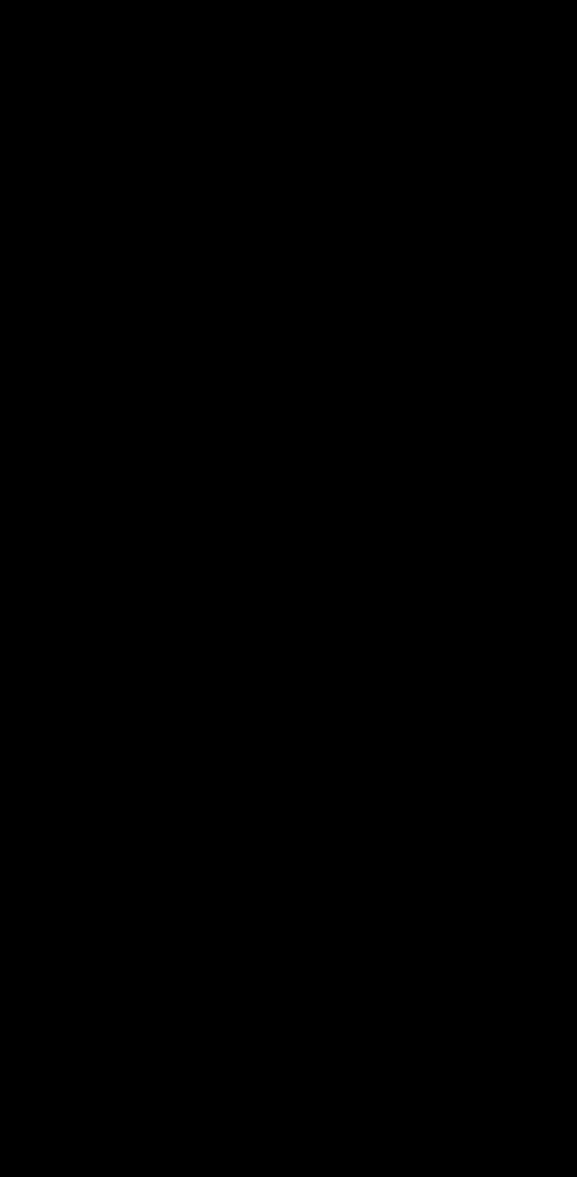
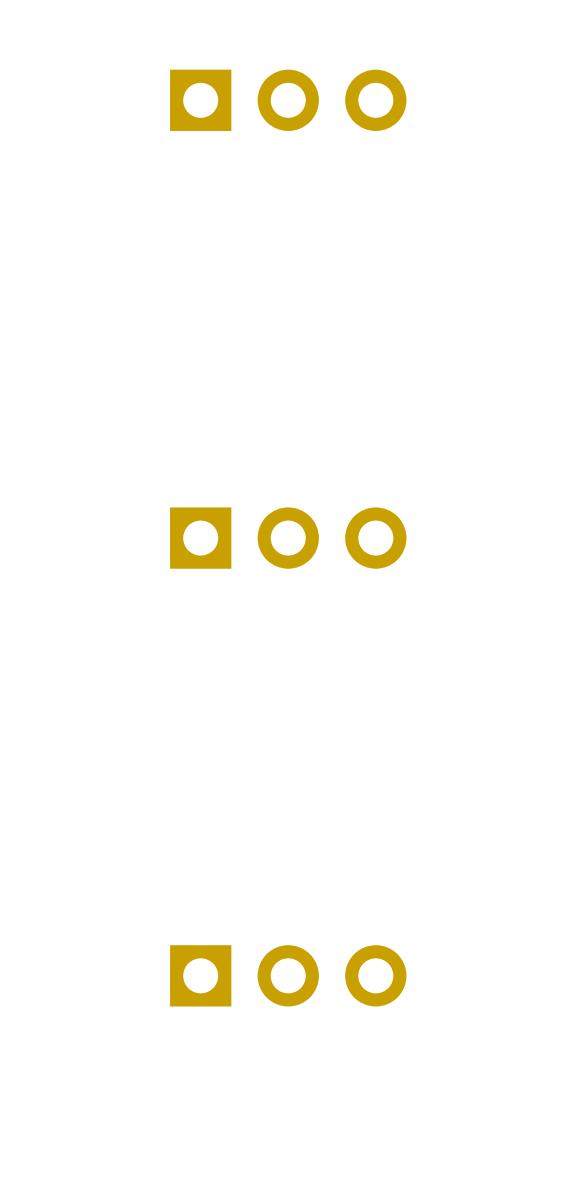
part: none -> (288, 100)
part: none -> (288, 538)
part: none -> (288, 975)

